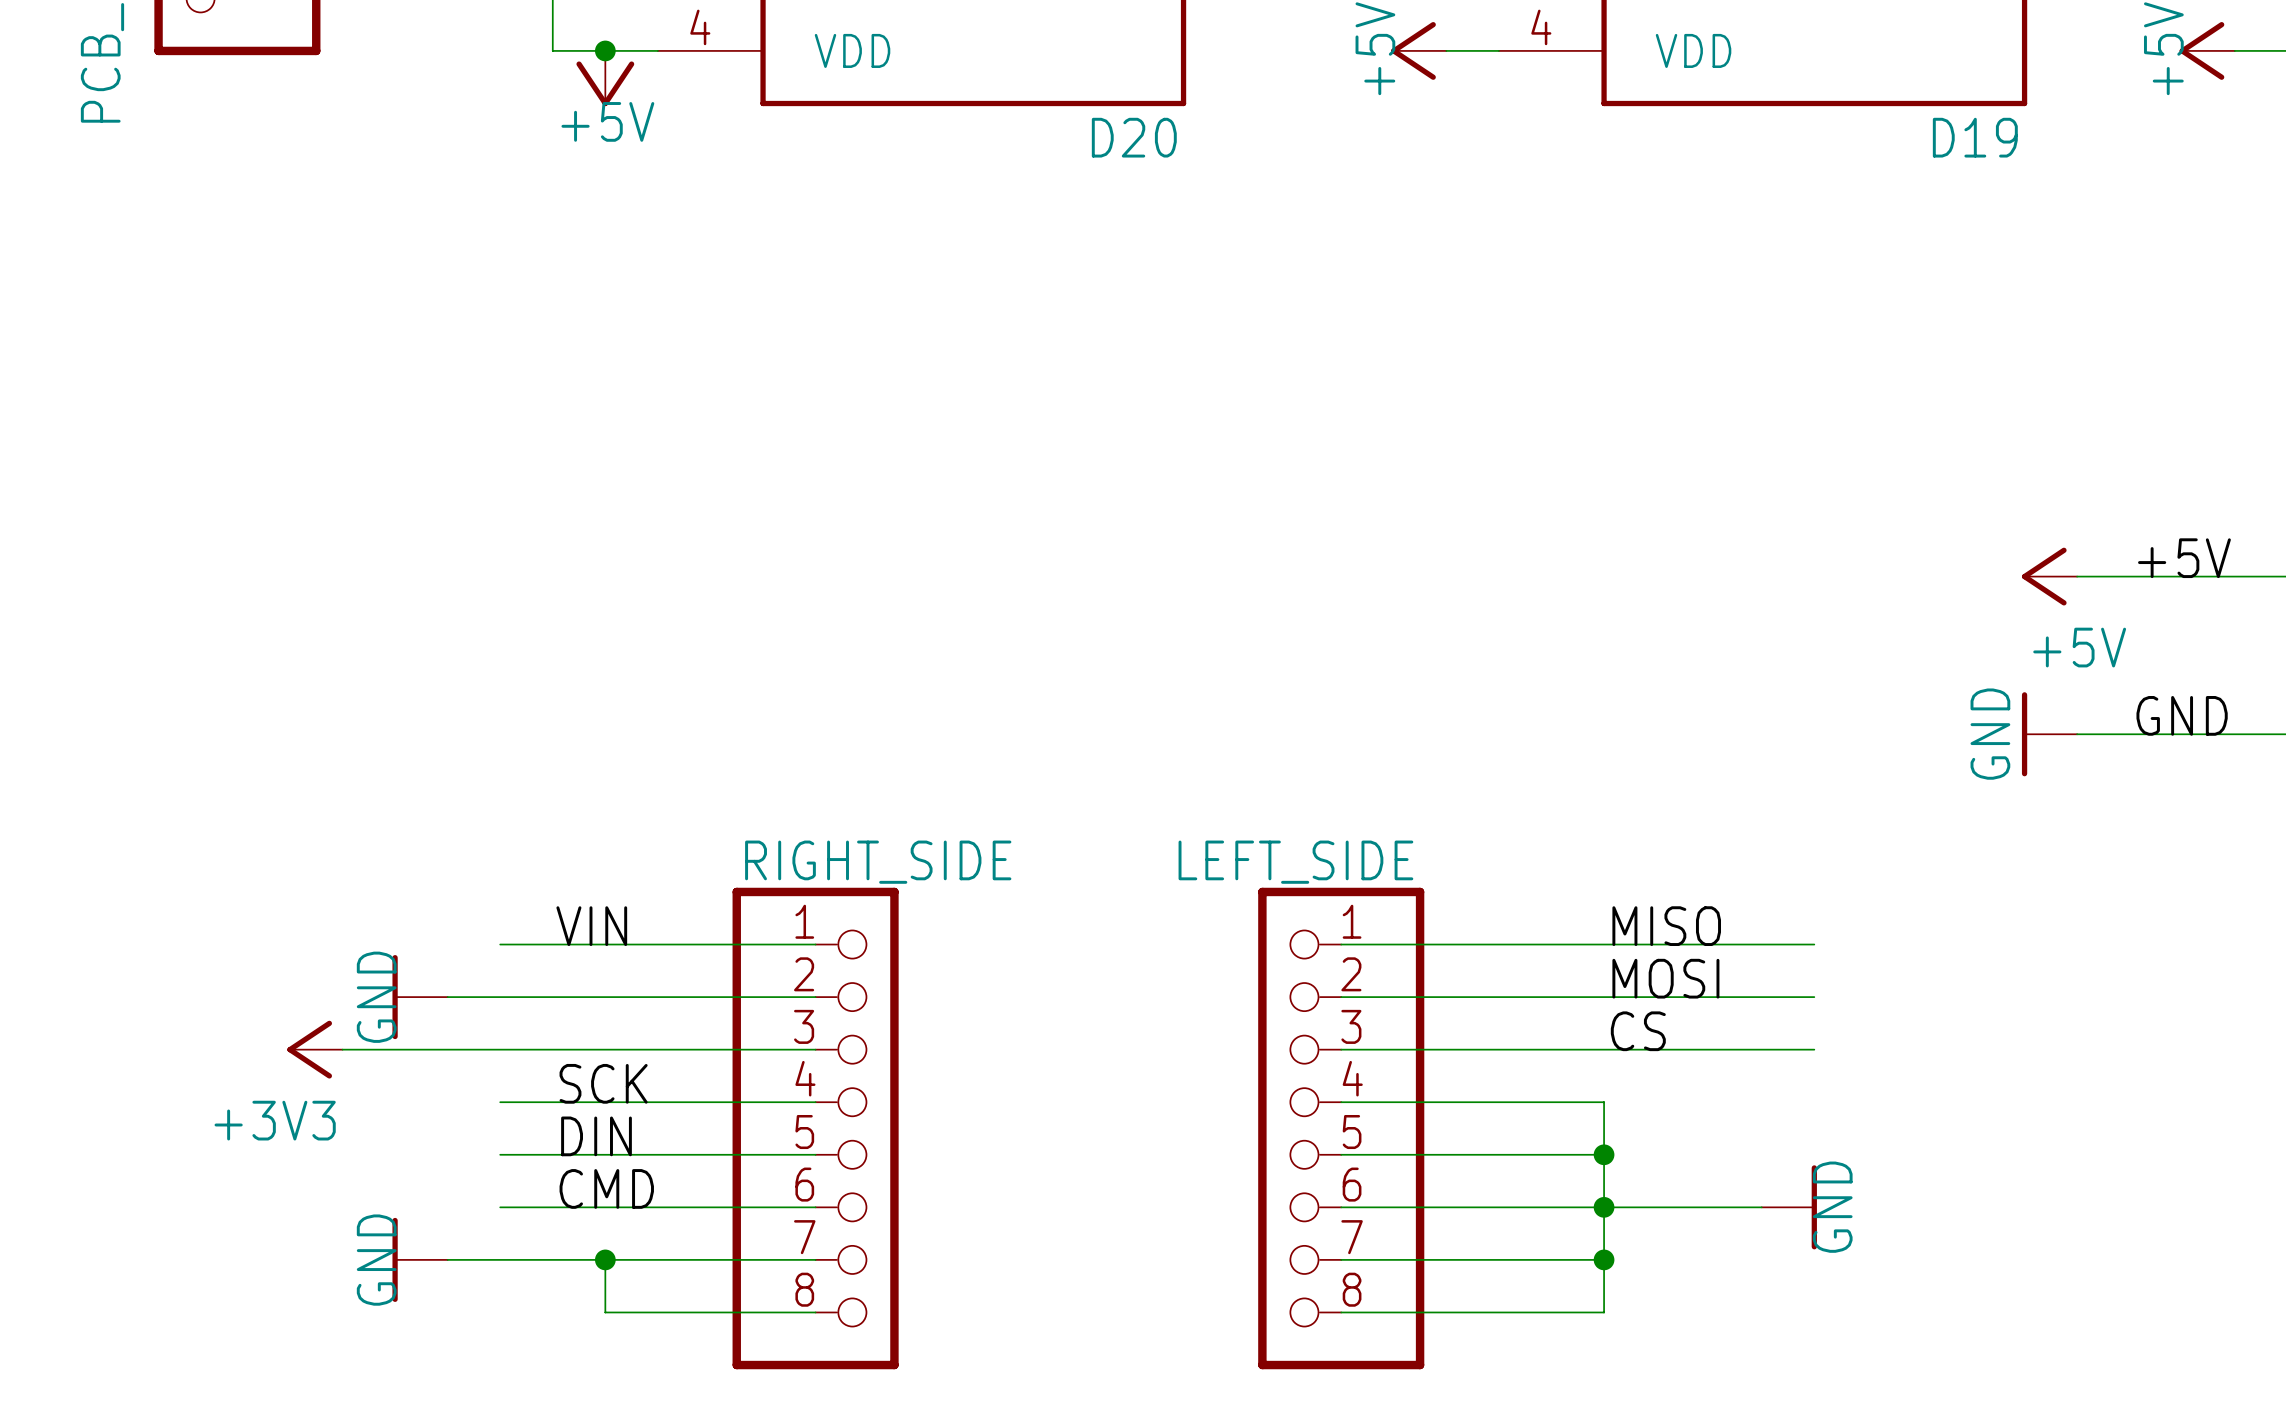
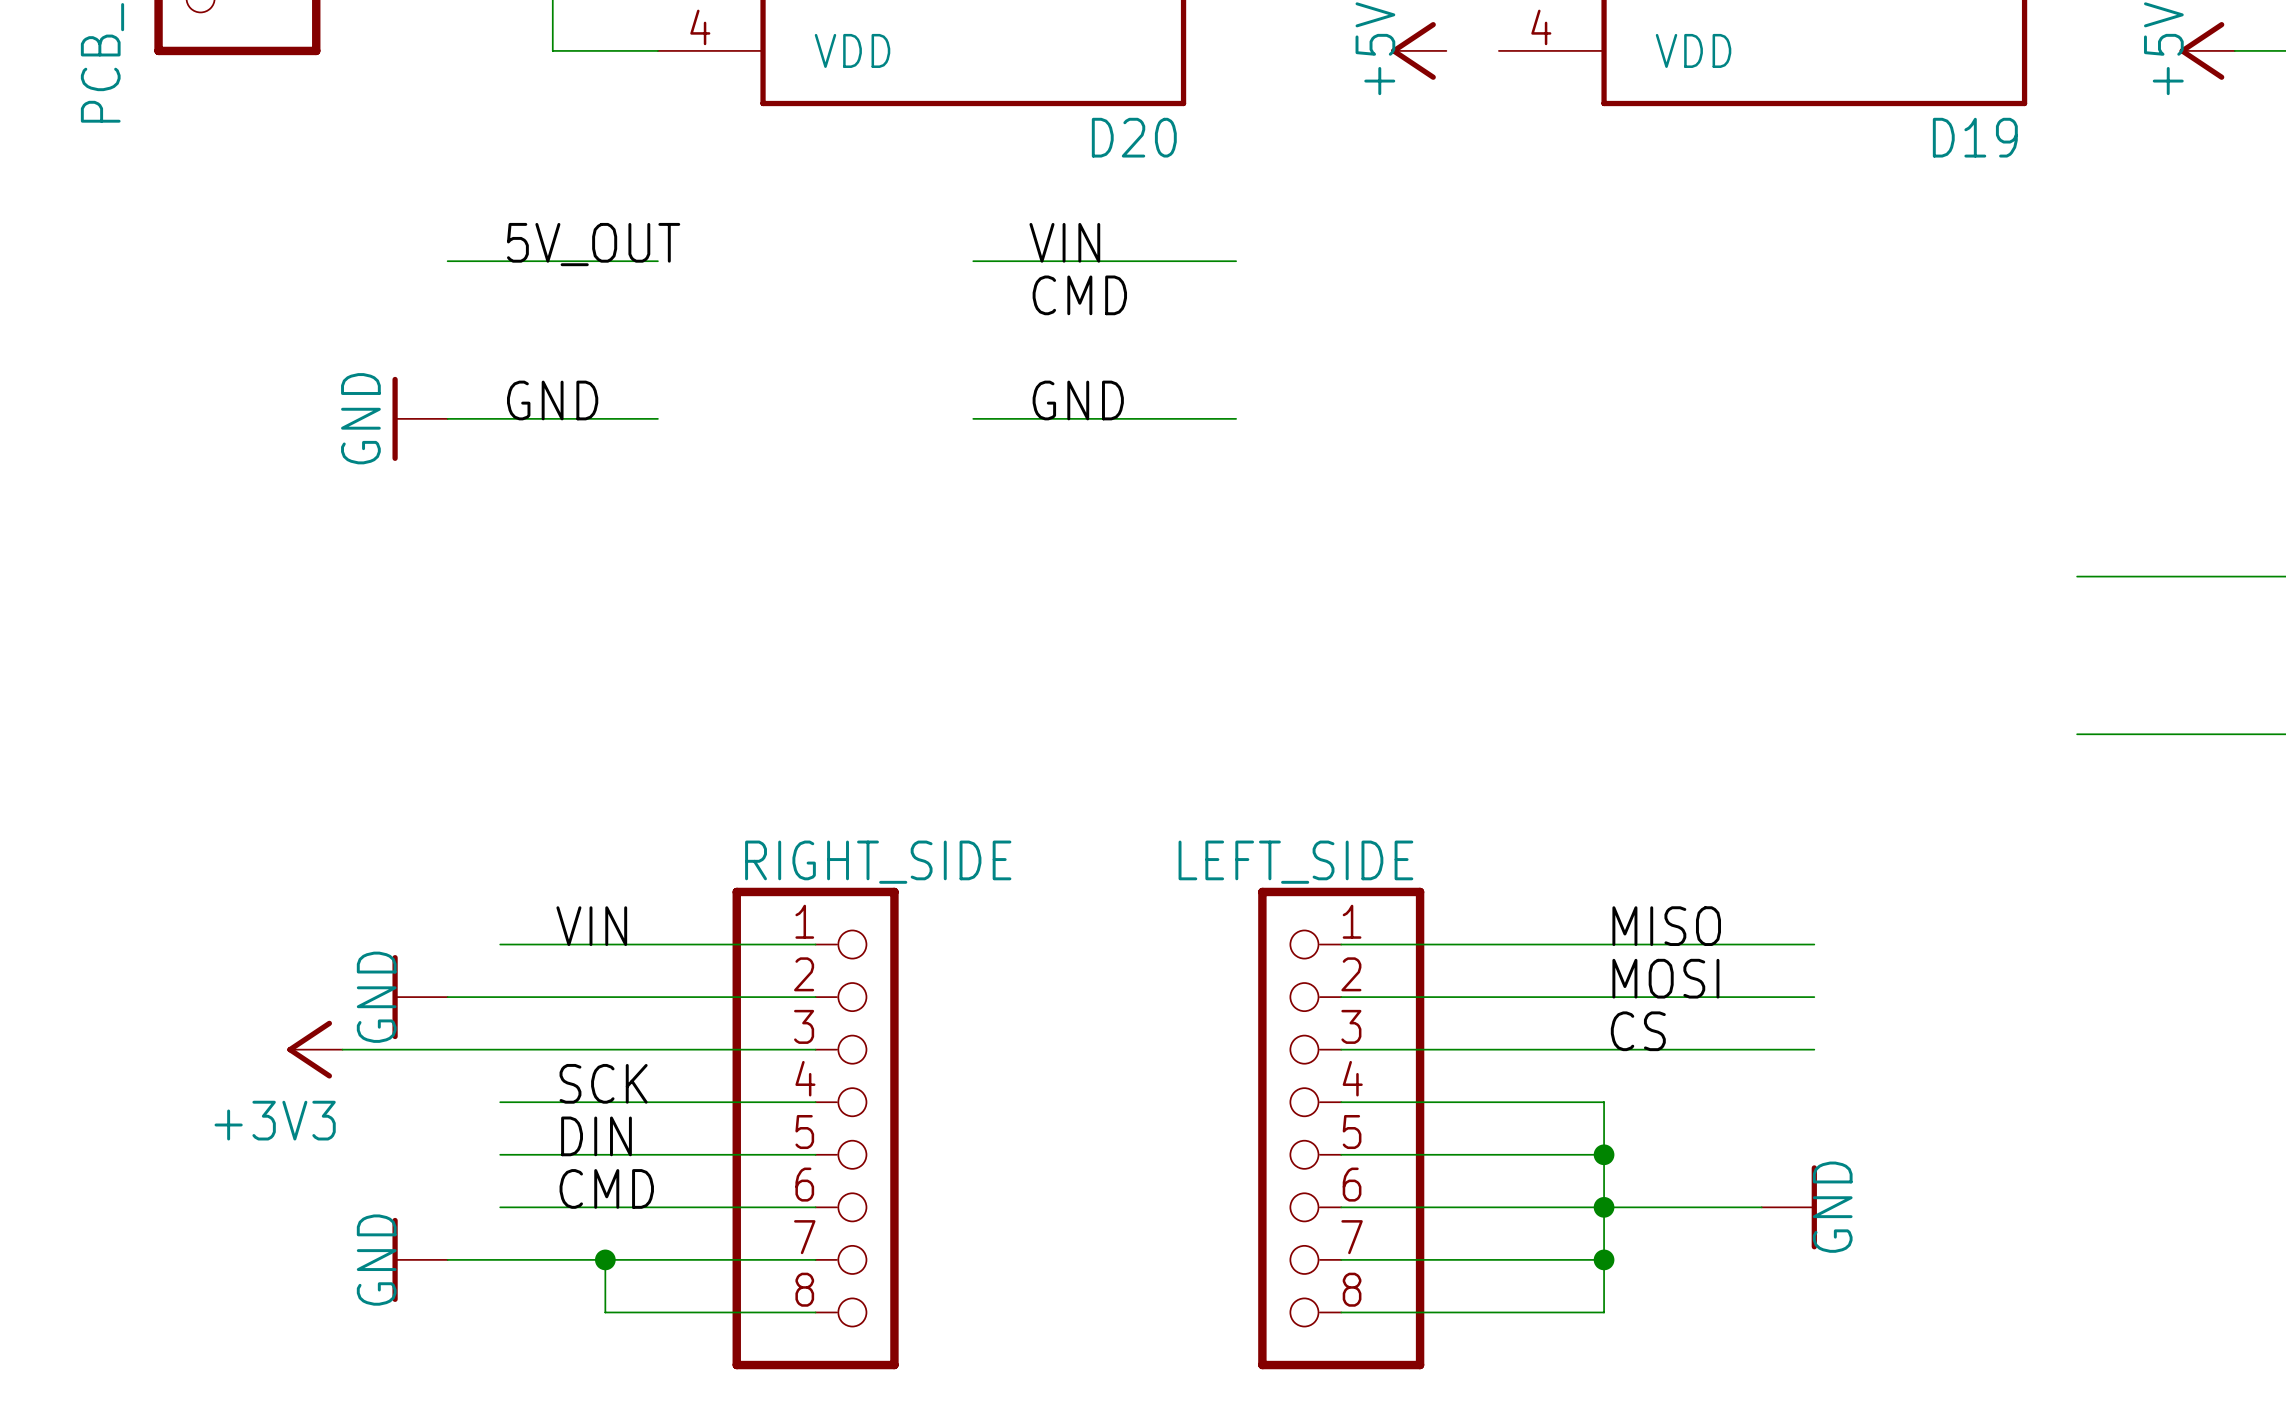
junction: (605, 50) -> none
wire: (1446, 50) (1498, 50) -> none
power symbol: +5V (605, 78) -> none
label: none -> VIN (1064, 242)
label: none -> 5V_OUT (593, 244)
wire: none -> (447, 261) (657, 261)
wire: none -> (973, 261) (1236, 261)
label: none -> CMD (1079, 295)
label: none -> GND (552, 400)
label: none -> GND (1078, 400)
power symbol: none -> GND (420, 418)
wire: none -> (447, 418) (657, 418)
wire: none -> (973, 418) (1236, 418)
label: +5V (2184, 558) -> none
power symbol: +5V (2049, 576) -> none
label: GND (2182, 715) -> none
power symbol: GND (2049, 734) -> none

